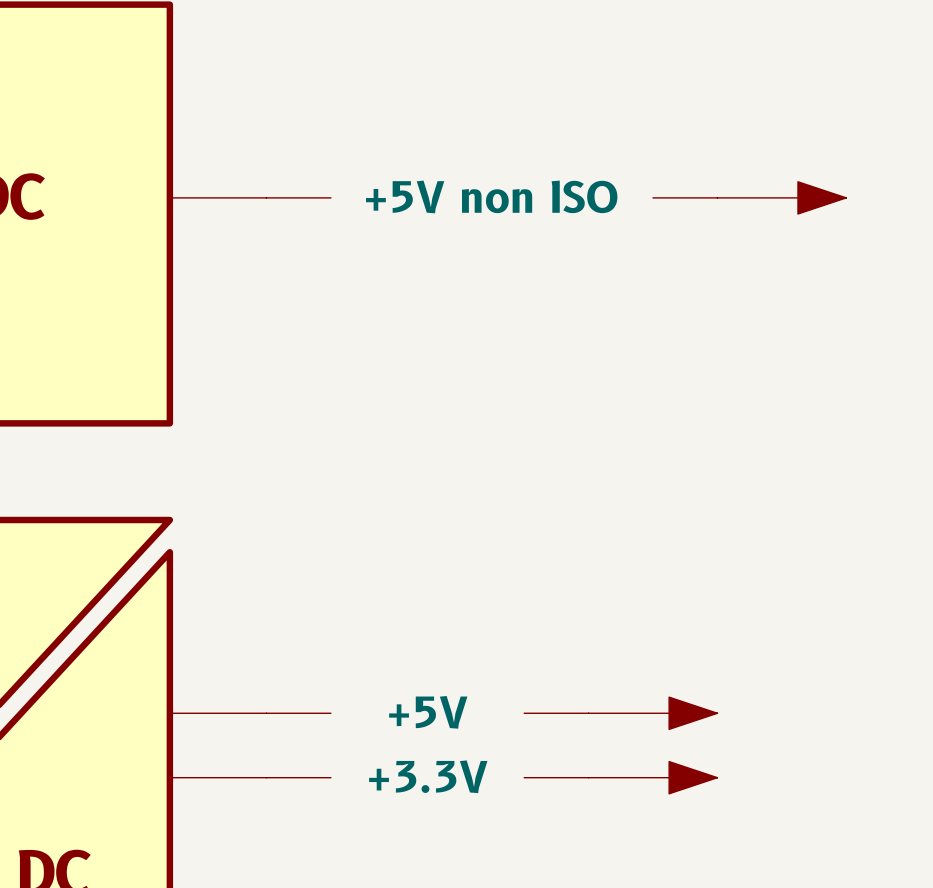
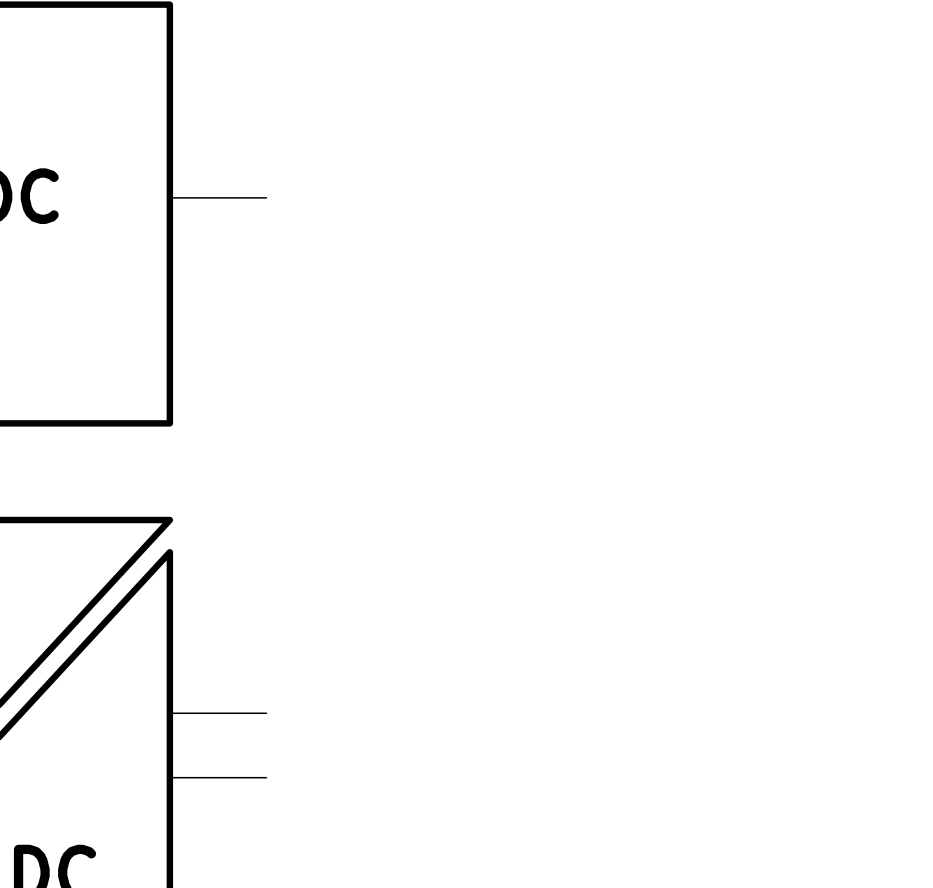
part: +5V non ISO (491, 197) -> none
part: (781, 197) -> none
part: +5V (427, 713) -> none
part: (653, 713) -> none
part: +3.3V (427, 777) -> none
part: (653, 777) -> none

